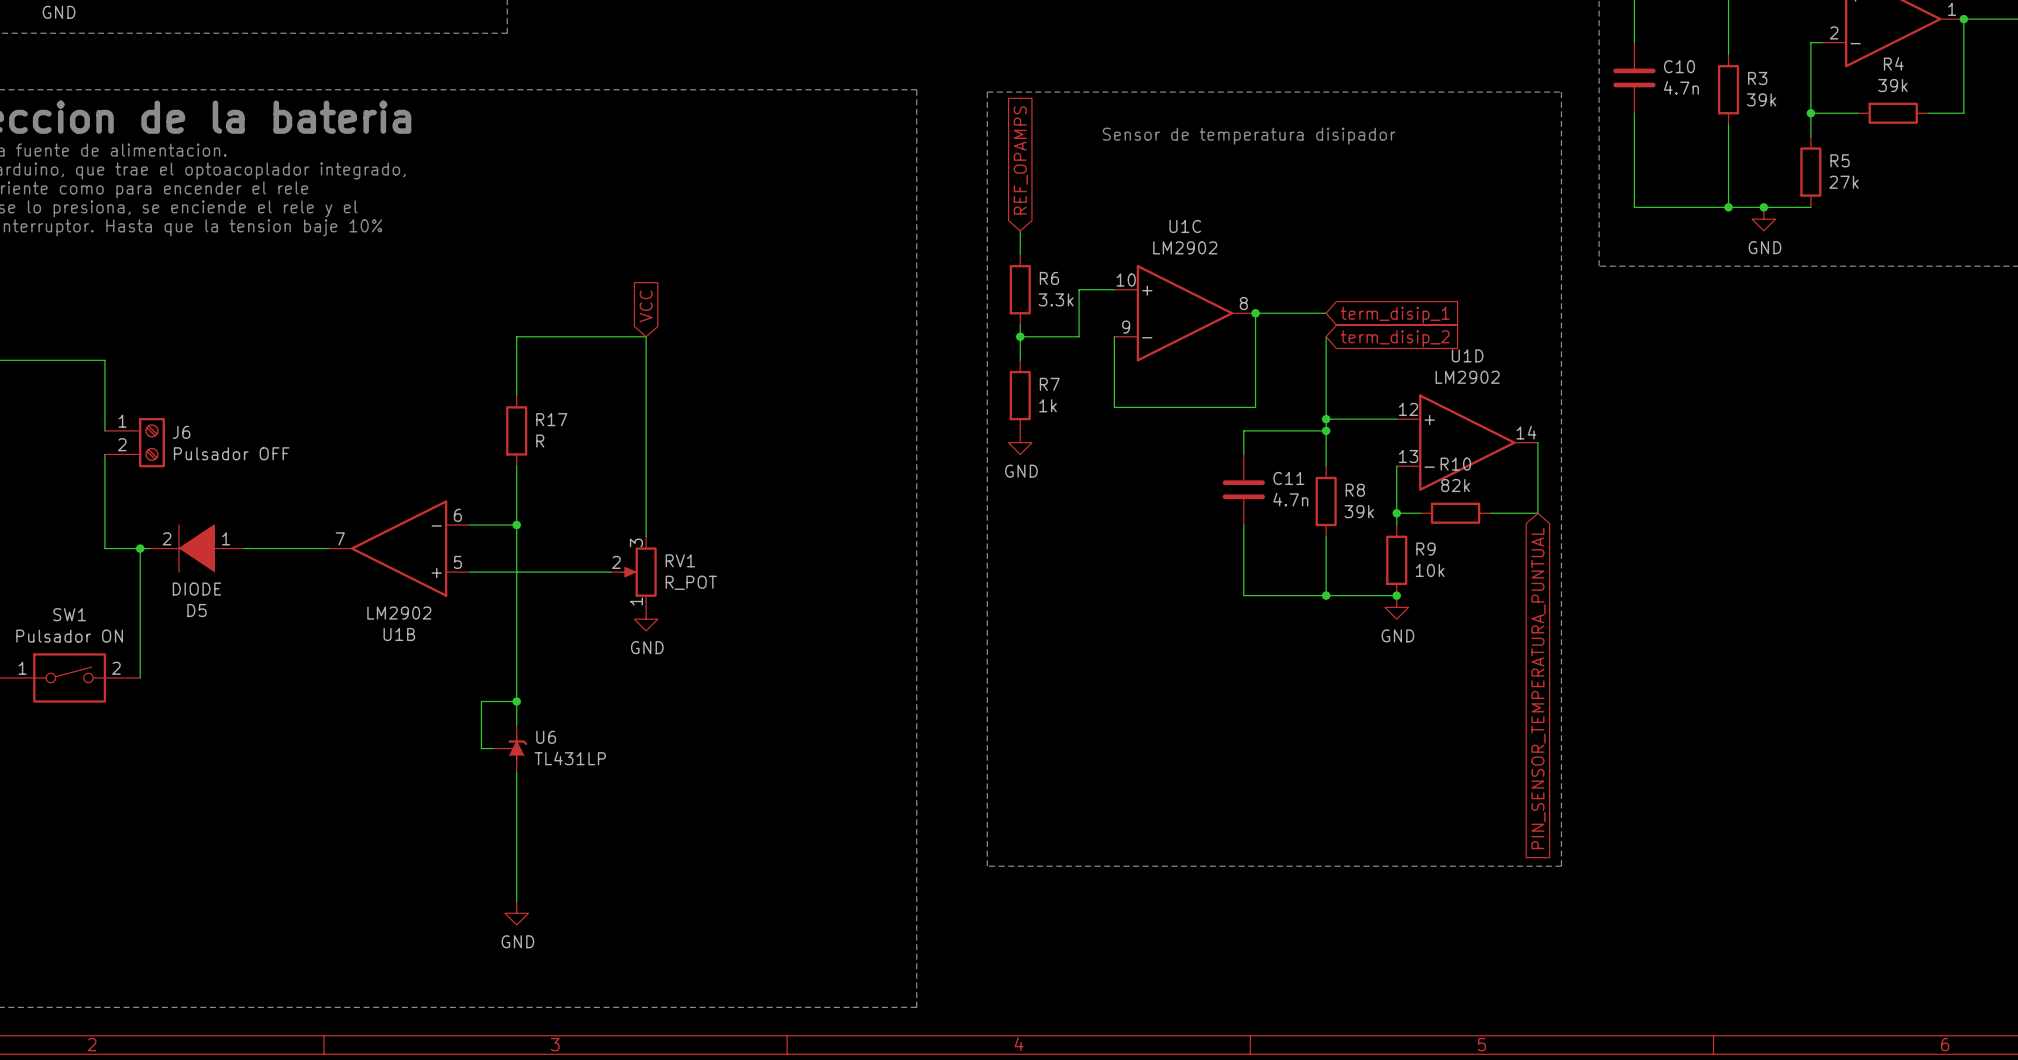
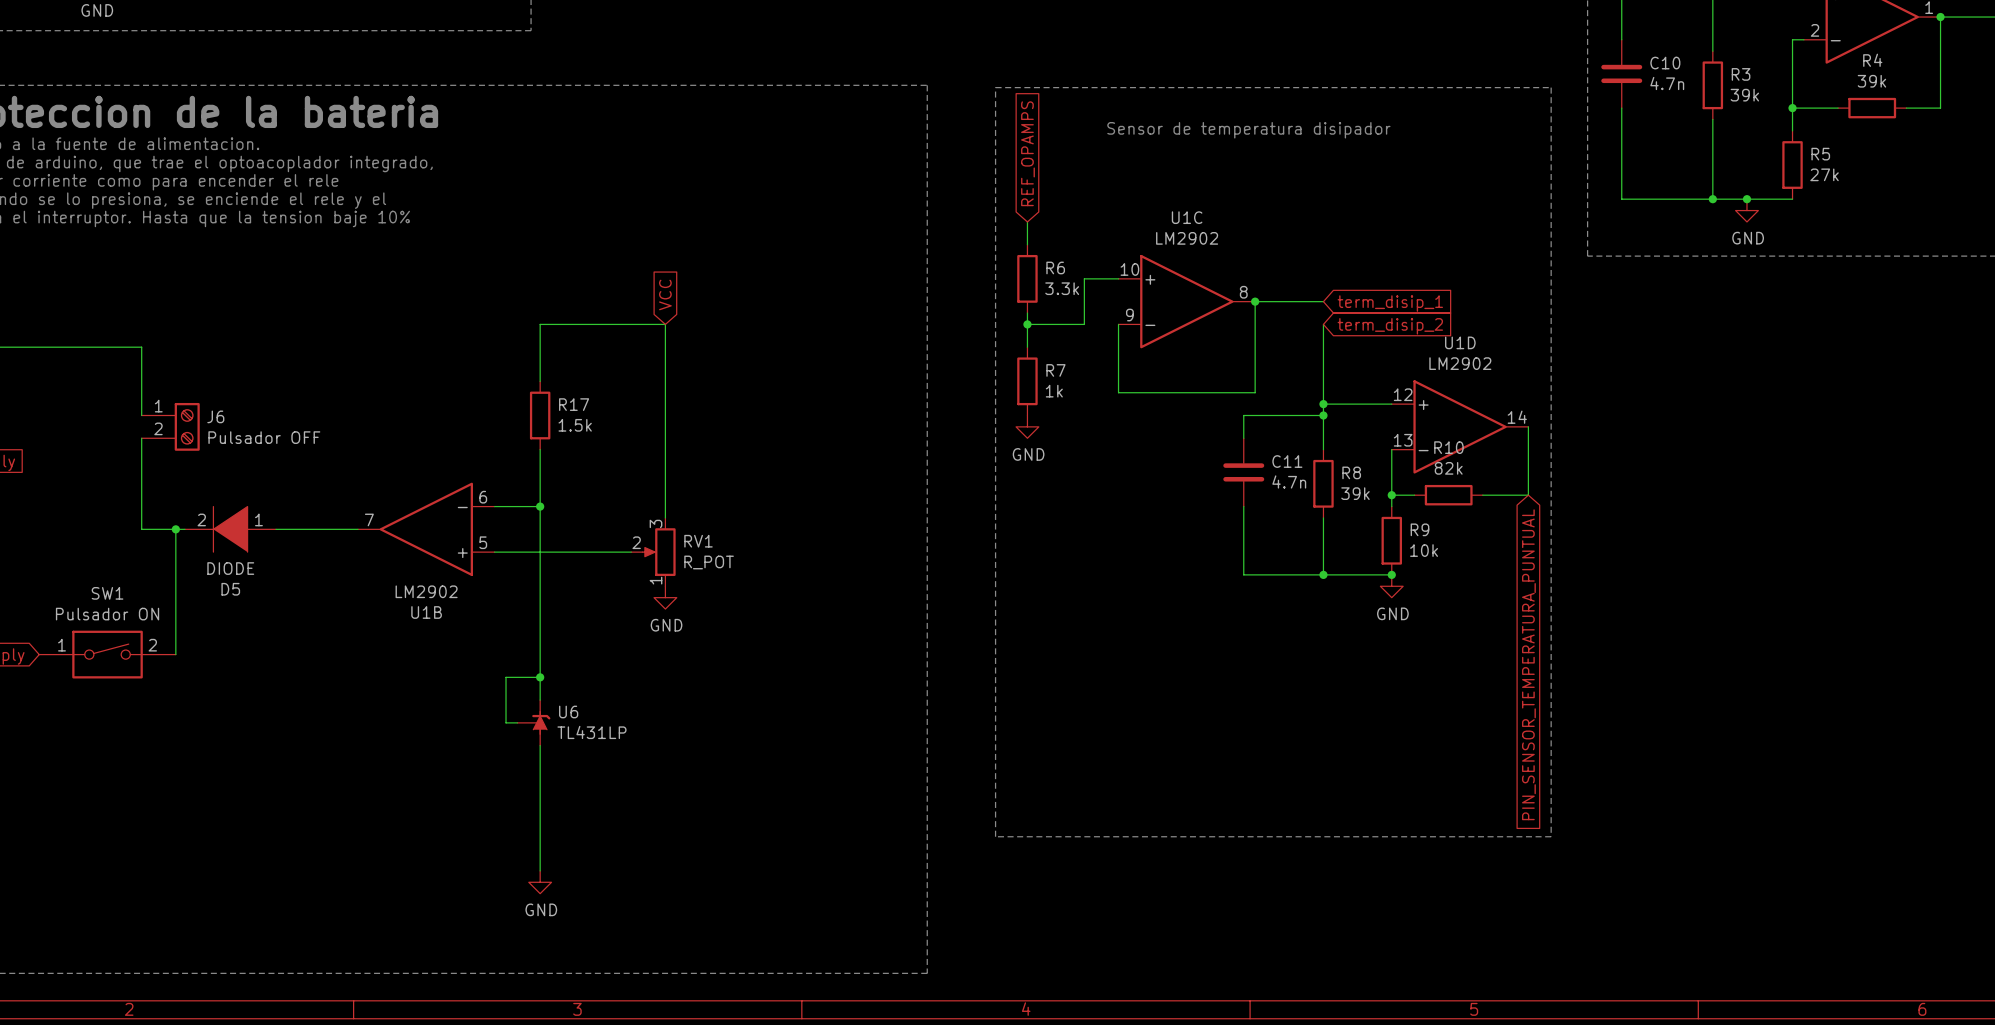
R17 value: R (540, 441) -> 1.5k (575, 425)

